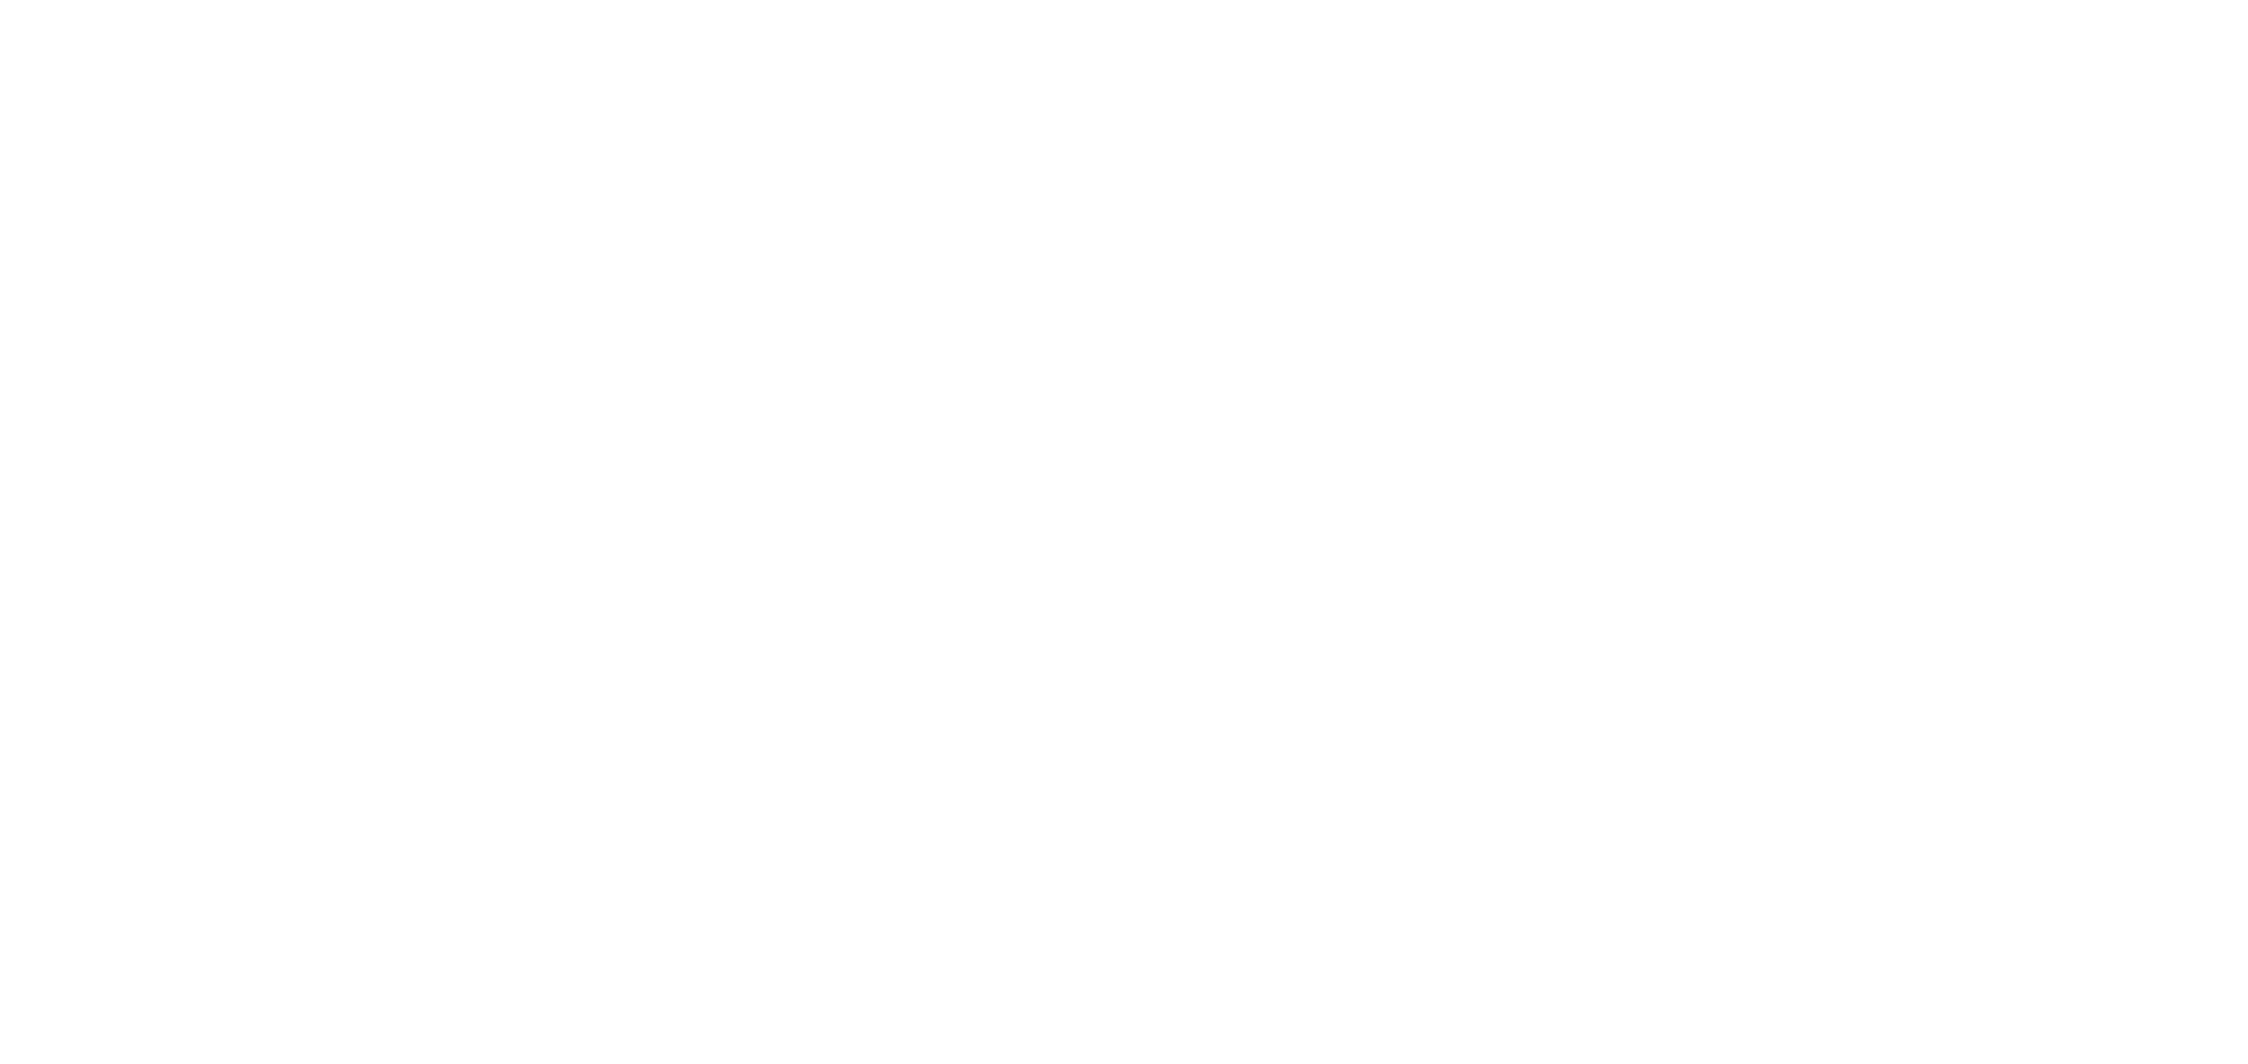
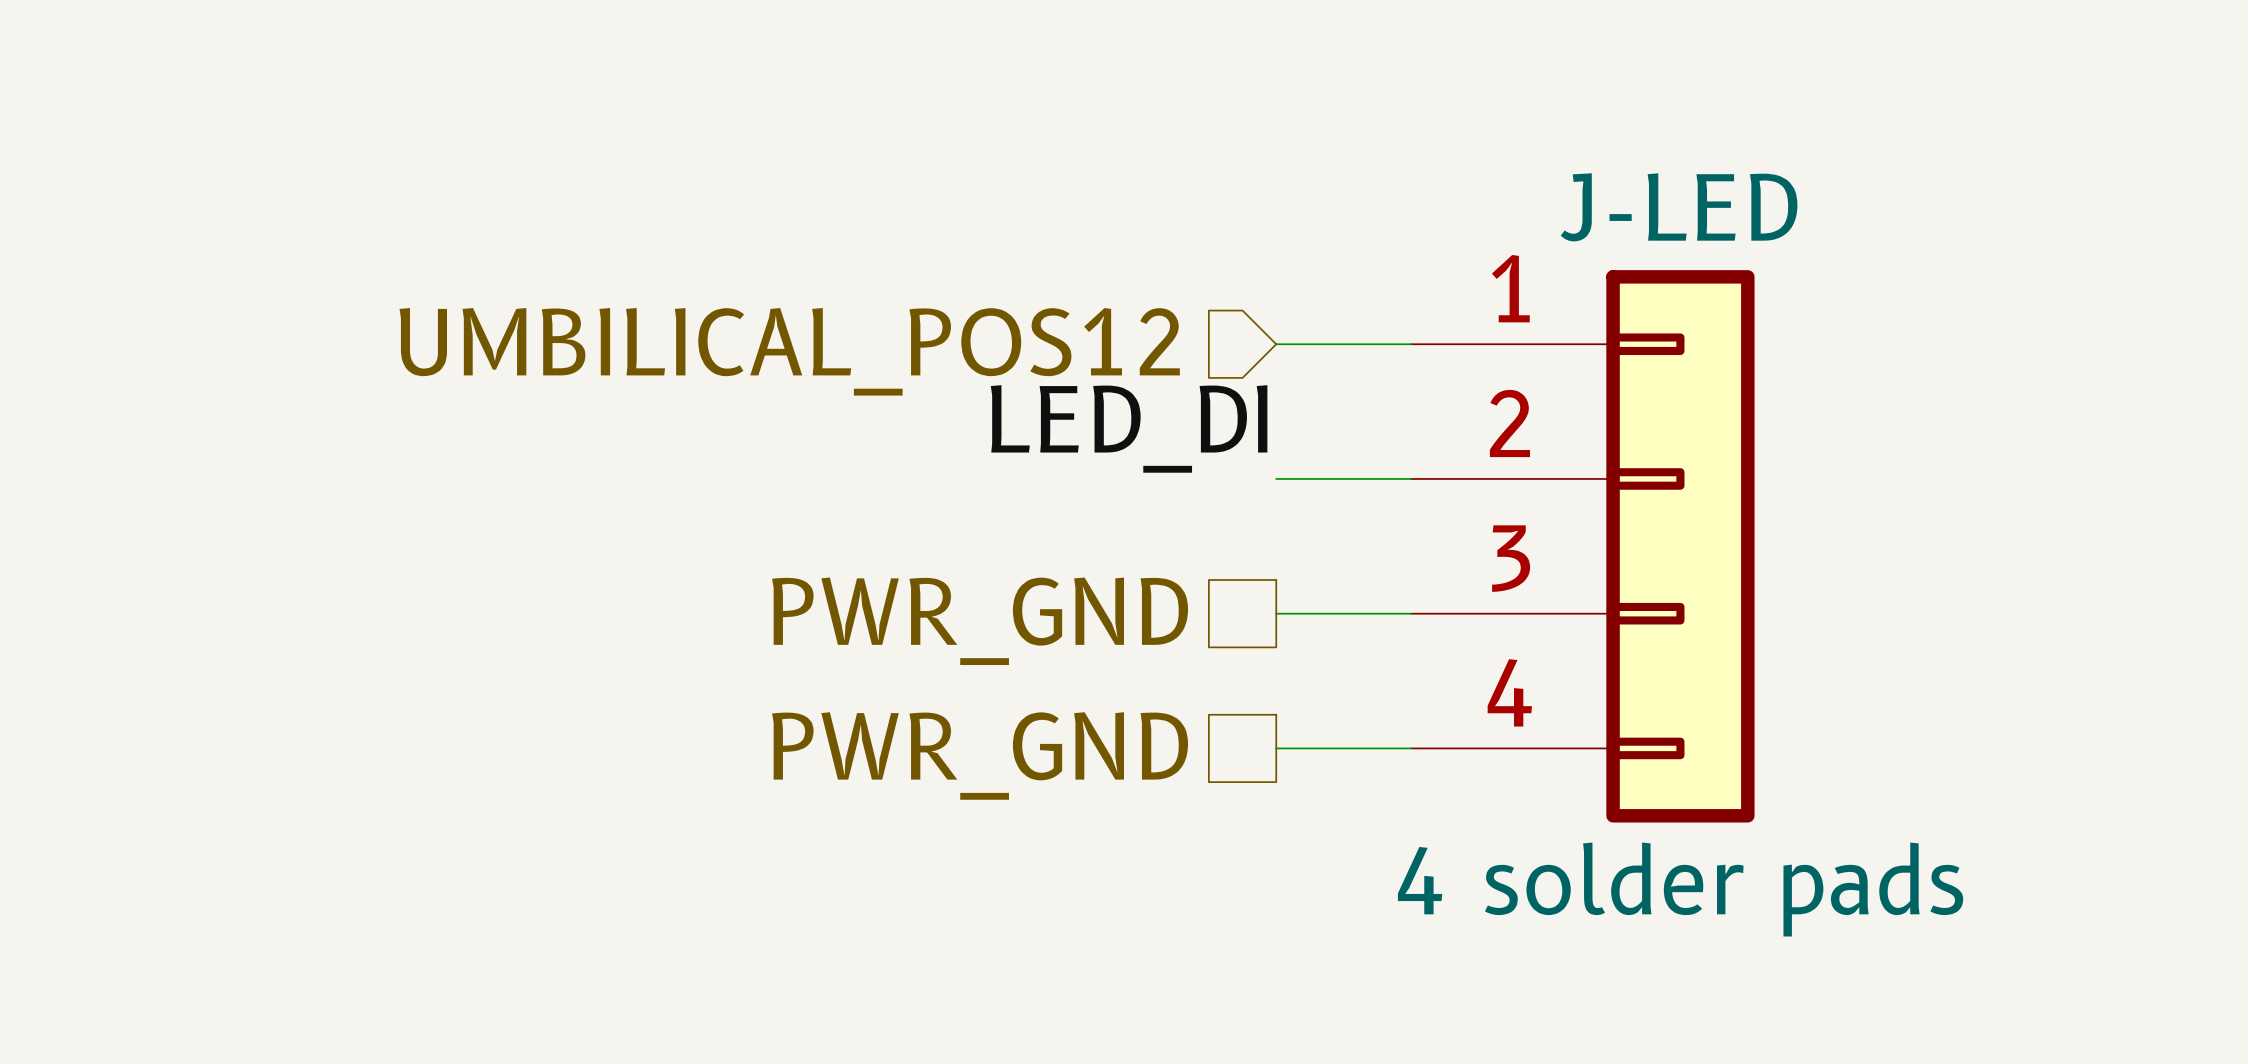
wire: none -> (1276, 344) (1410, 344)
hierarchical label: none -> UMBILICAL_POS12 (789, 351)
label: none -> LED_DI (1129, 428)
wire: none -> (1276, 478) (1410, 478)
J-LED: none -> 4 solder pads (1582, 546)
wire: none -> (1276, 613) (1410, 613)
hierarchical label: none -> PWR_GND (980, 621)
wire: none -> (1276, 748) (1410, 748)
hierarchical label: none -> PWR_GND (980, 756)

